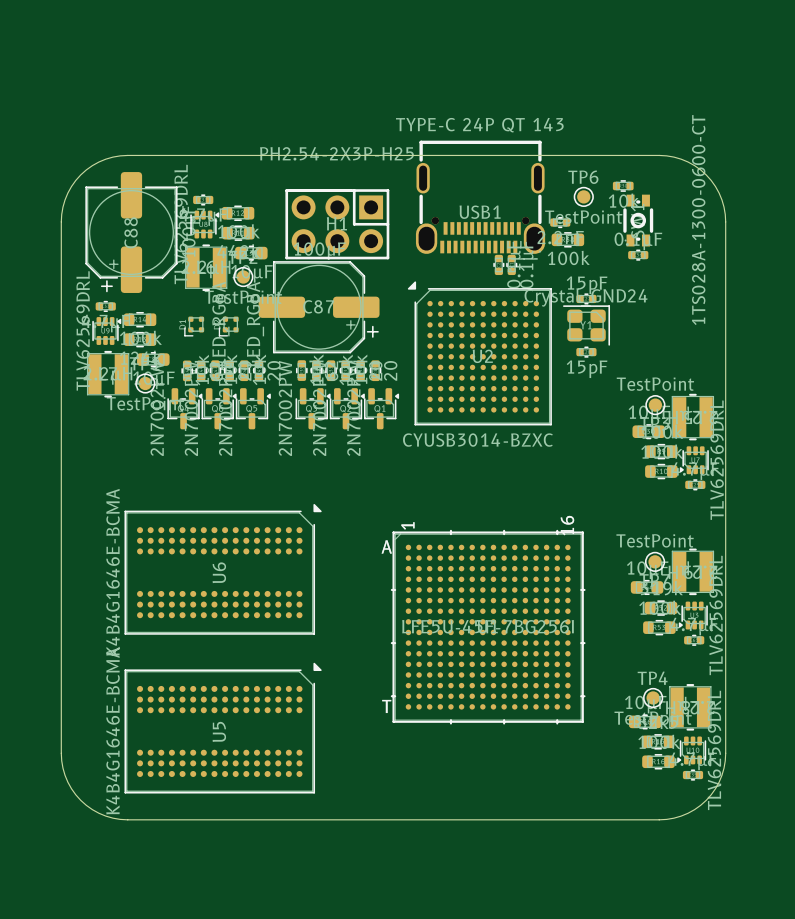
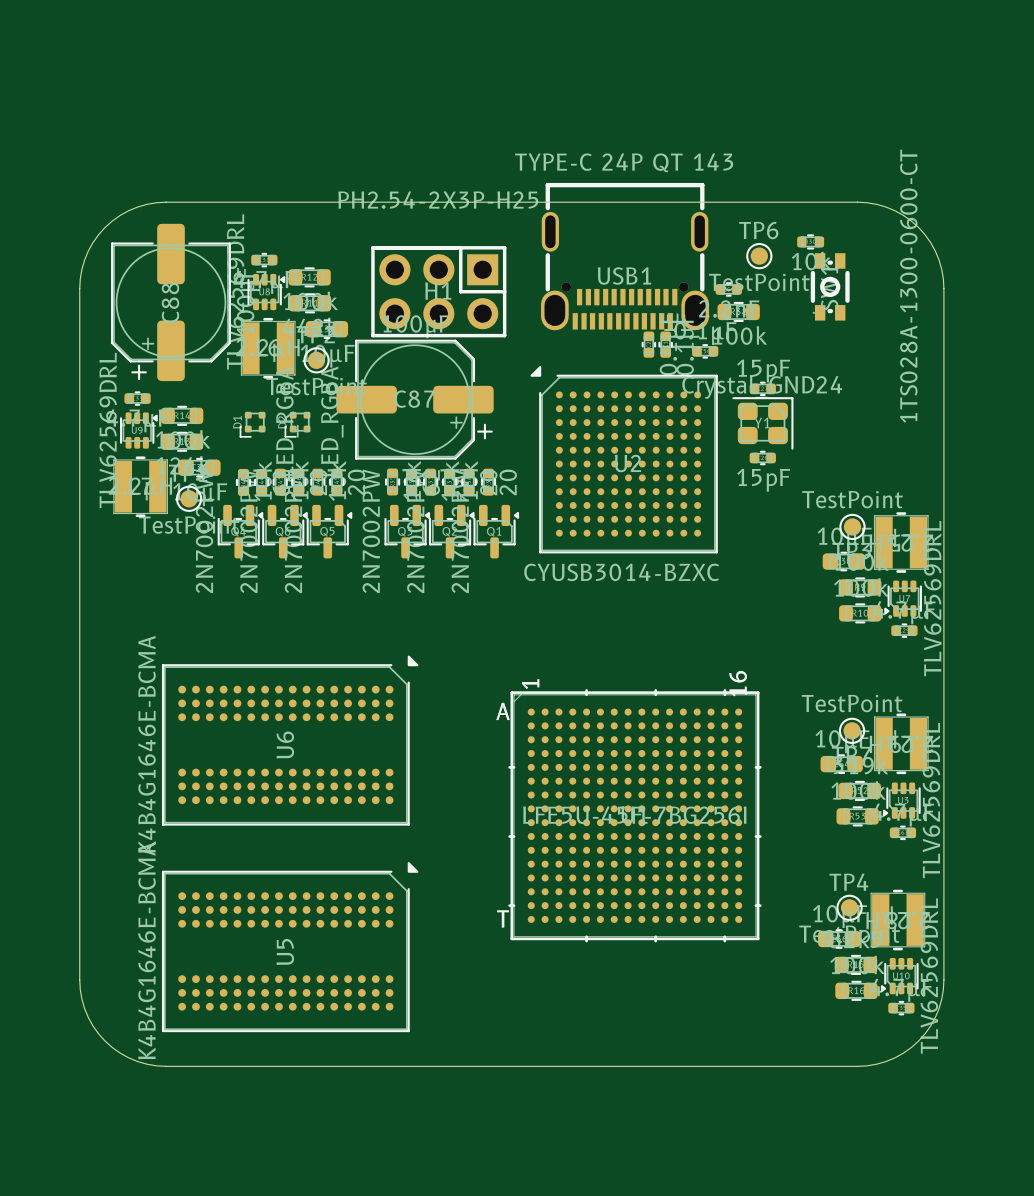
part position: (638, 255) -> (705, 351)

